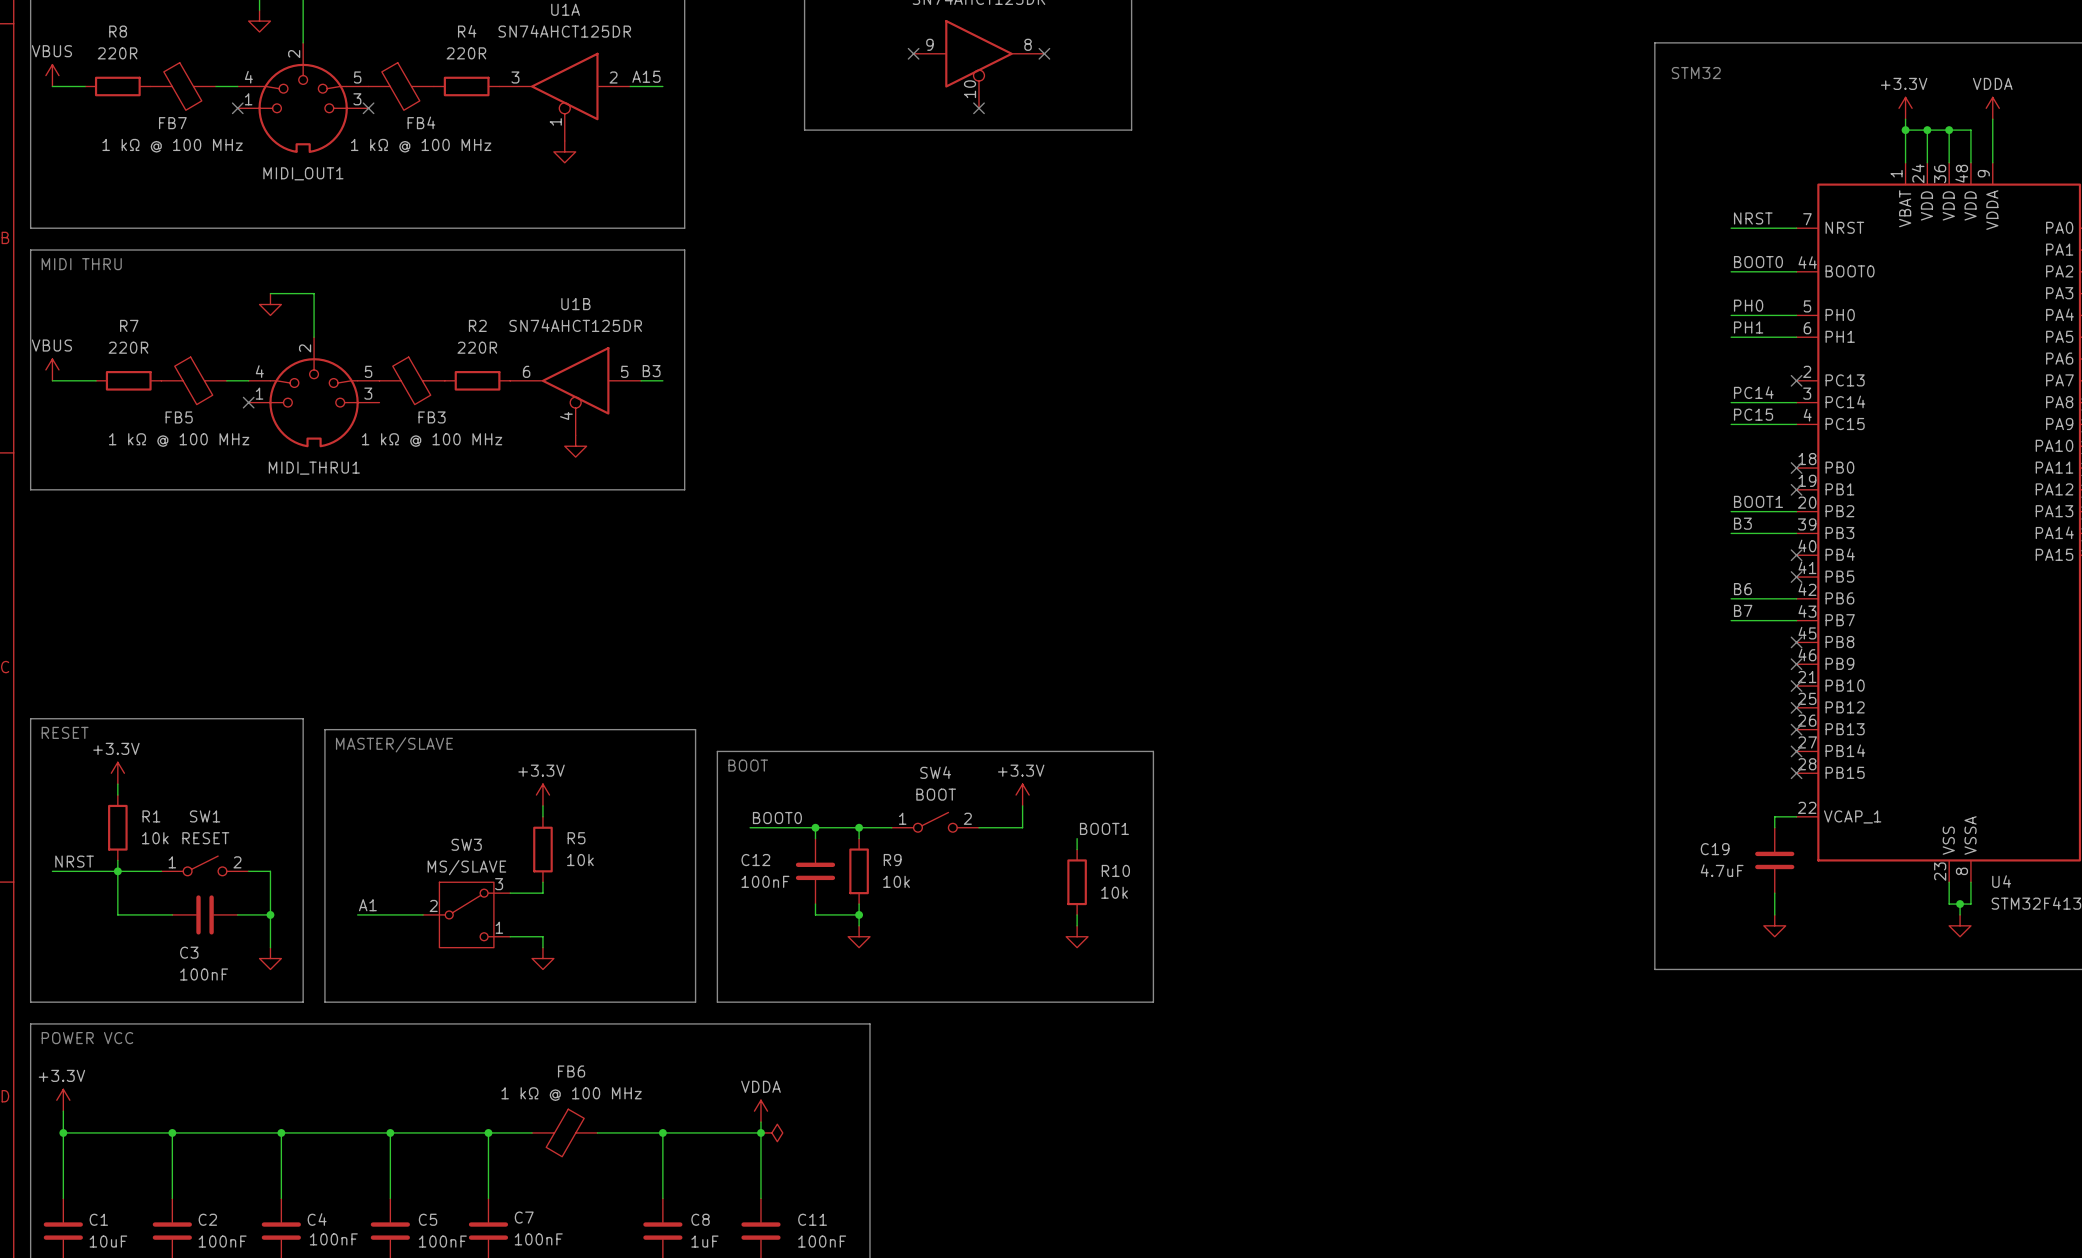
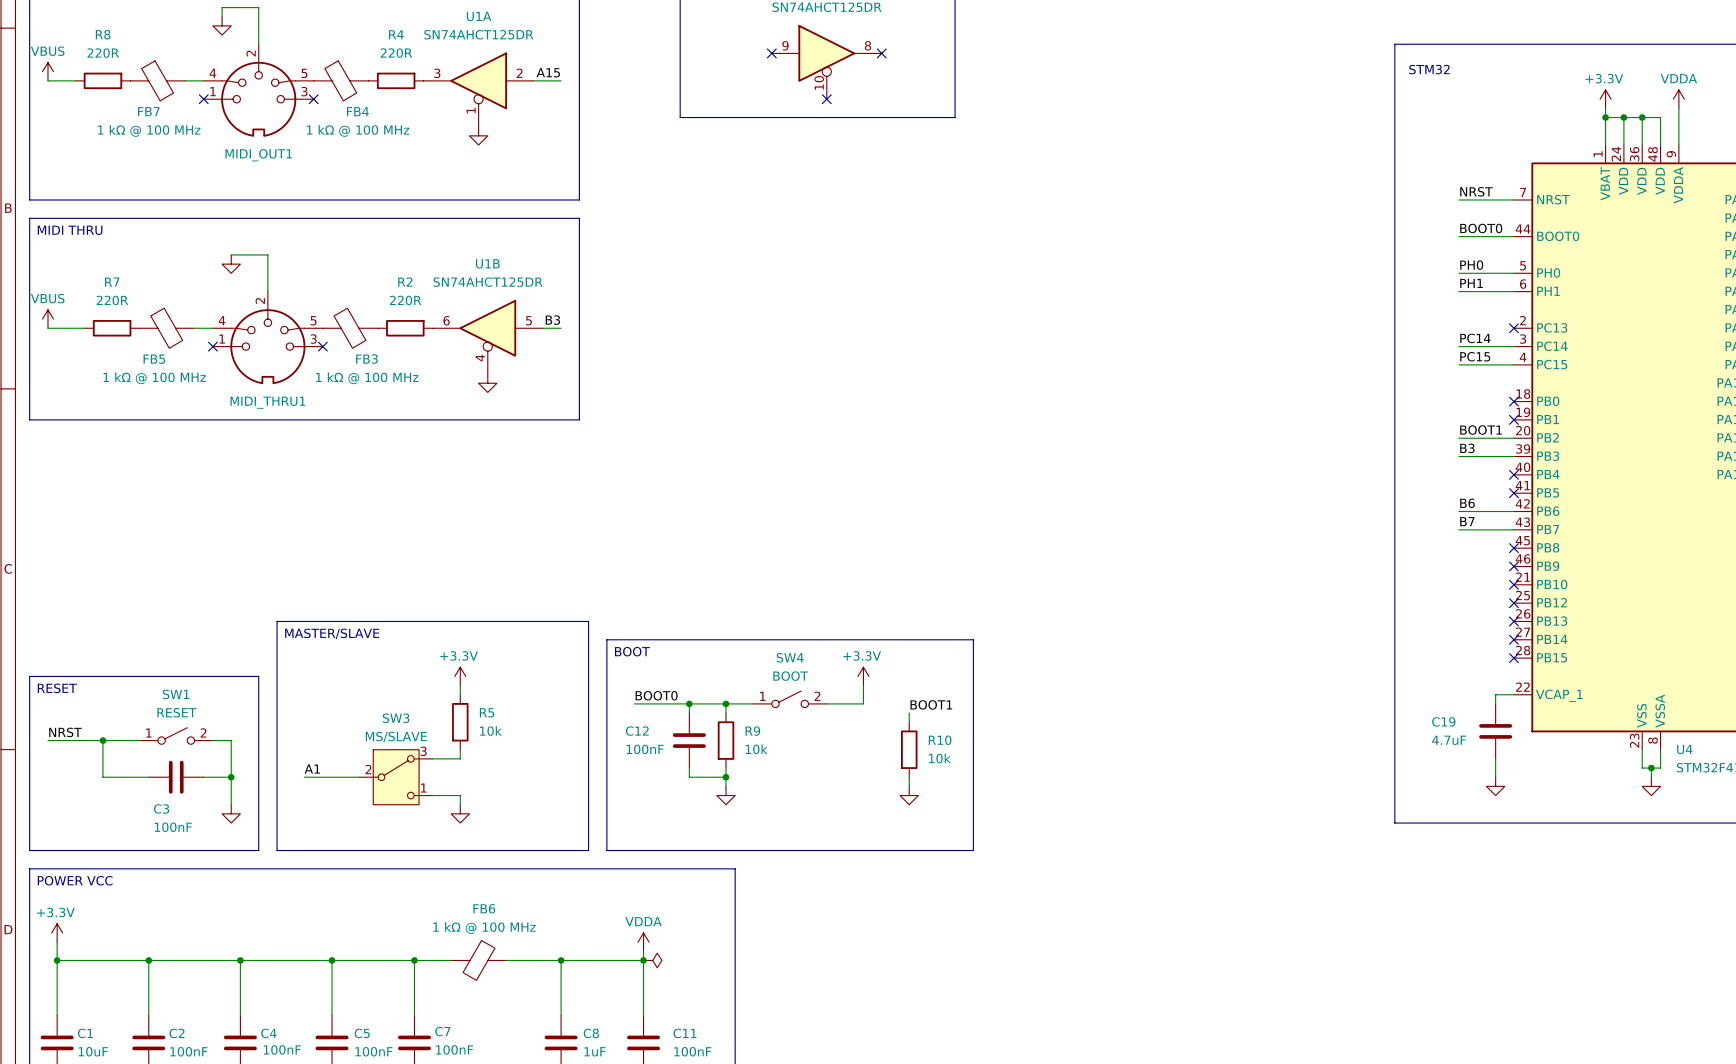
no-connect mark: none -> (322, 346)
text position: RESET (65, 732) -> RESET (57, 688)
power symbol: +3.3V (117, 773) -> none
wire: (117, 784) (117, 795) -> none
line: (30, 795) (30, 718) (303, 718) (303, 795) -> (29, 676) (258, 676)
R1: 10k (117, 827) -> none
wire: (117, 860) (117, 871) -> none

